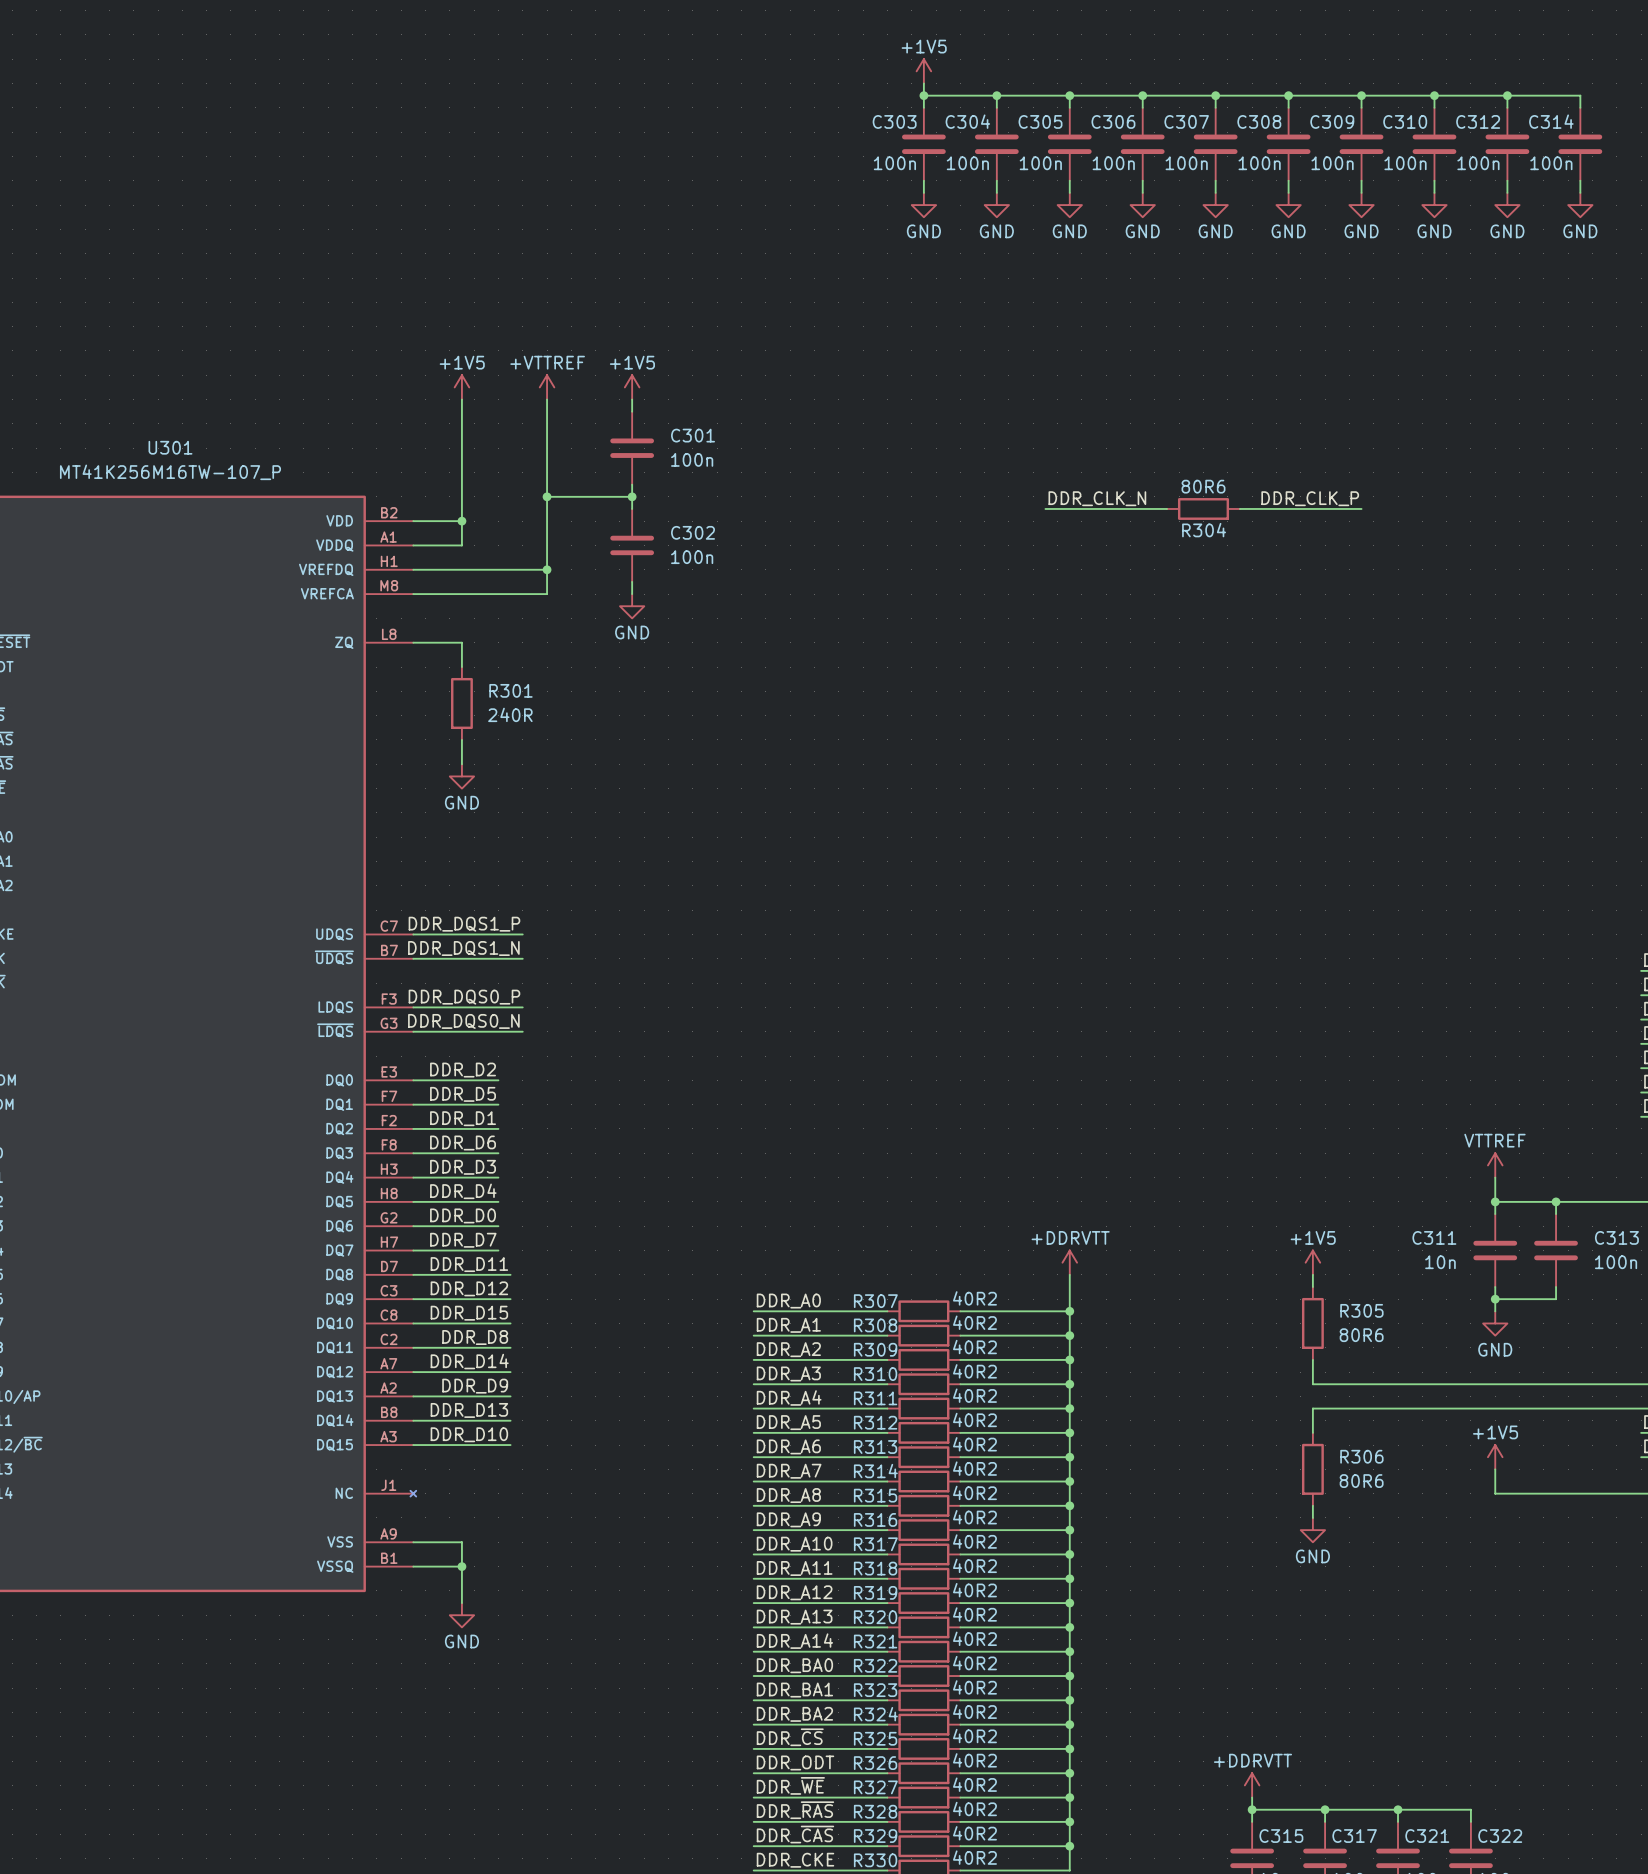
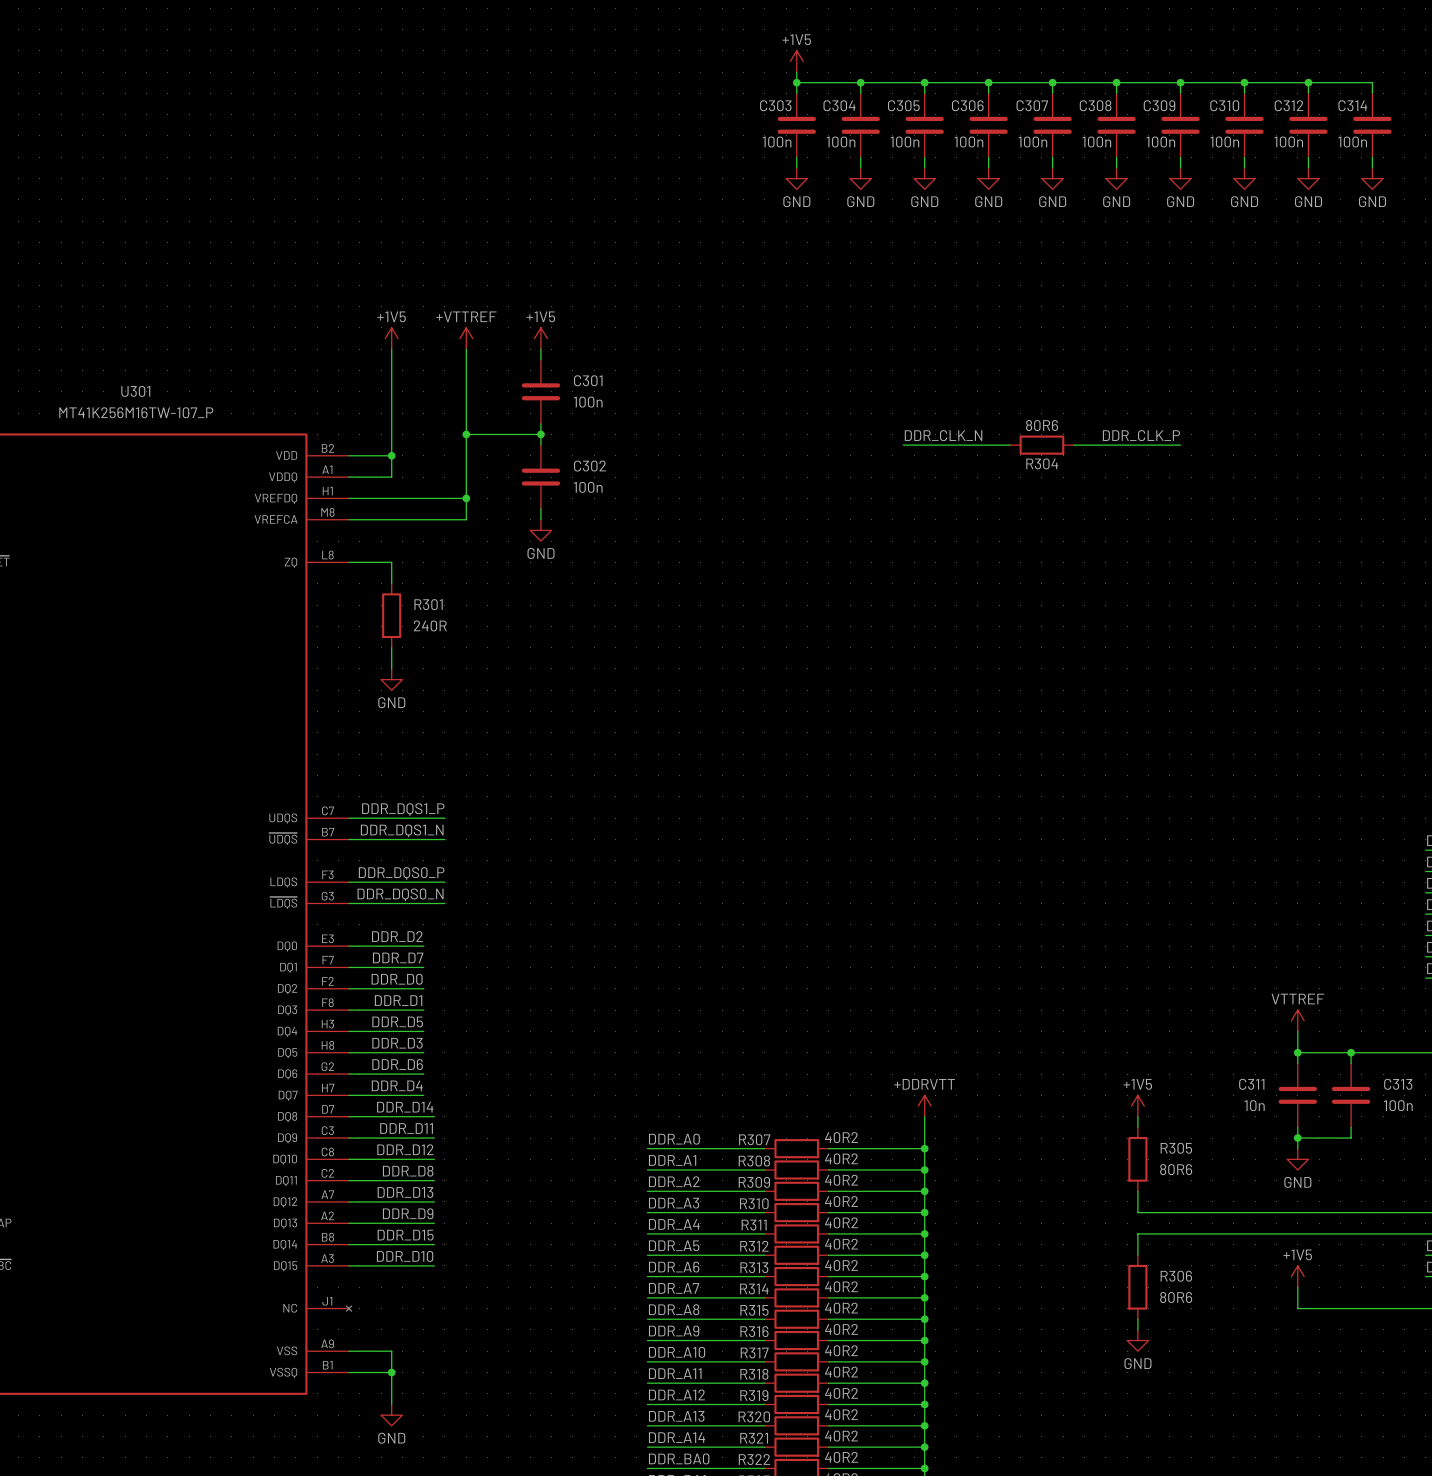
label: DDR_D5 (463, 1094) -> DDR_D7 (398, 957)
label: DDR_D1 (463, 1118) -> DDR_D0 (397, 979)
label: DDR_D6 (463, 1143) -> DDR_D1 (398, 1000)
label: DDR_D3 (463, 1167) -> DDR_D5 (397, 1021)
label: DDR_D4 (463, 1191) -> DDR_D3 (397, 1043)
label: DDR_D0 (463, 1215) -> DDR_D6 (397, 1064)
label: DDR_D7 (463, 1240) -> DDR_D4 (397, 1085)
label: DDR_D11 (469, 1264) -> DDR_D14 (405, 1107)
label: DDR_D12 (469, 1288) -> DDR_D11 (406, 1128)
label: DDR_D15 (469, 1313) -> DDR_D12 (405, 1149)
label: DDR_D14 (469, 1361) -> DDR_D13 (405, 1192)
label: DDR_D13 (469, 1410) -> DDR_D15 (405, 1235)

